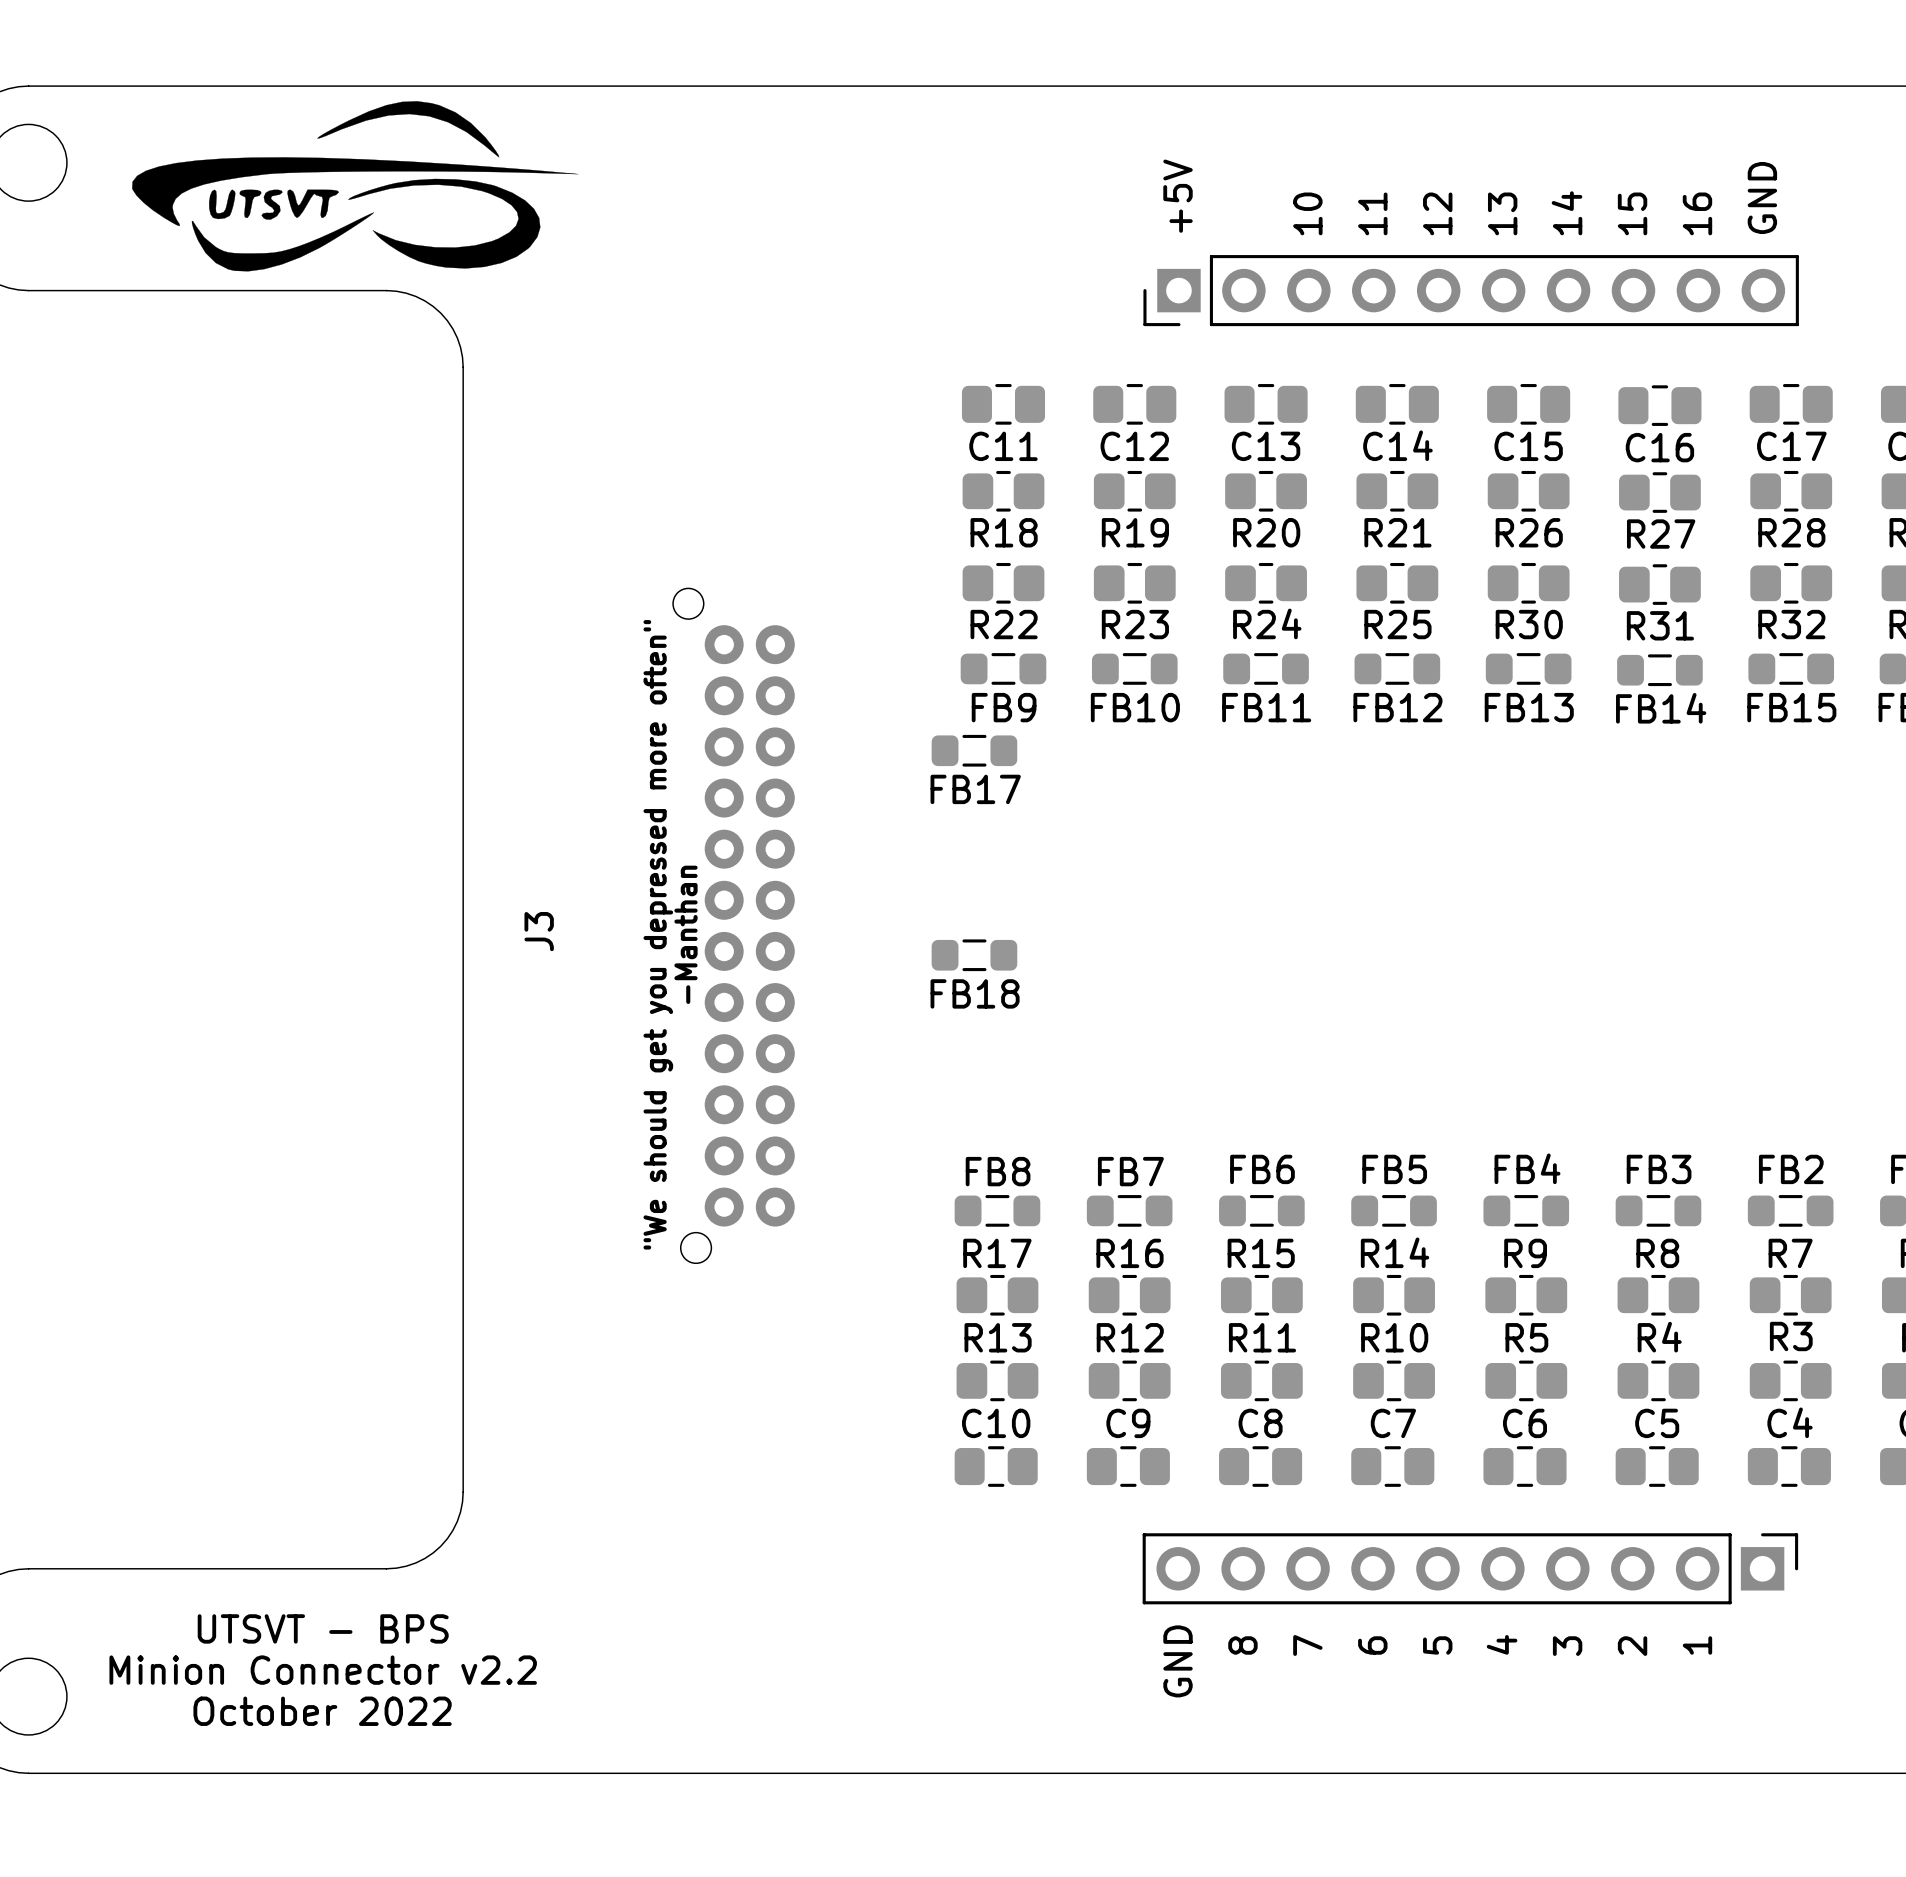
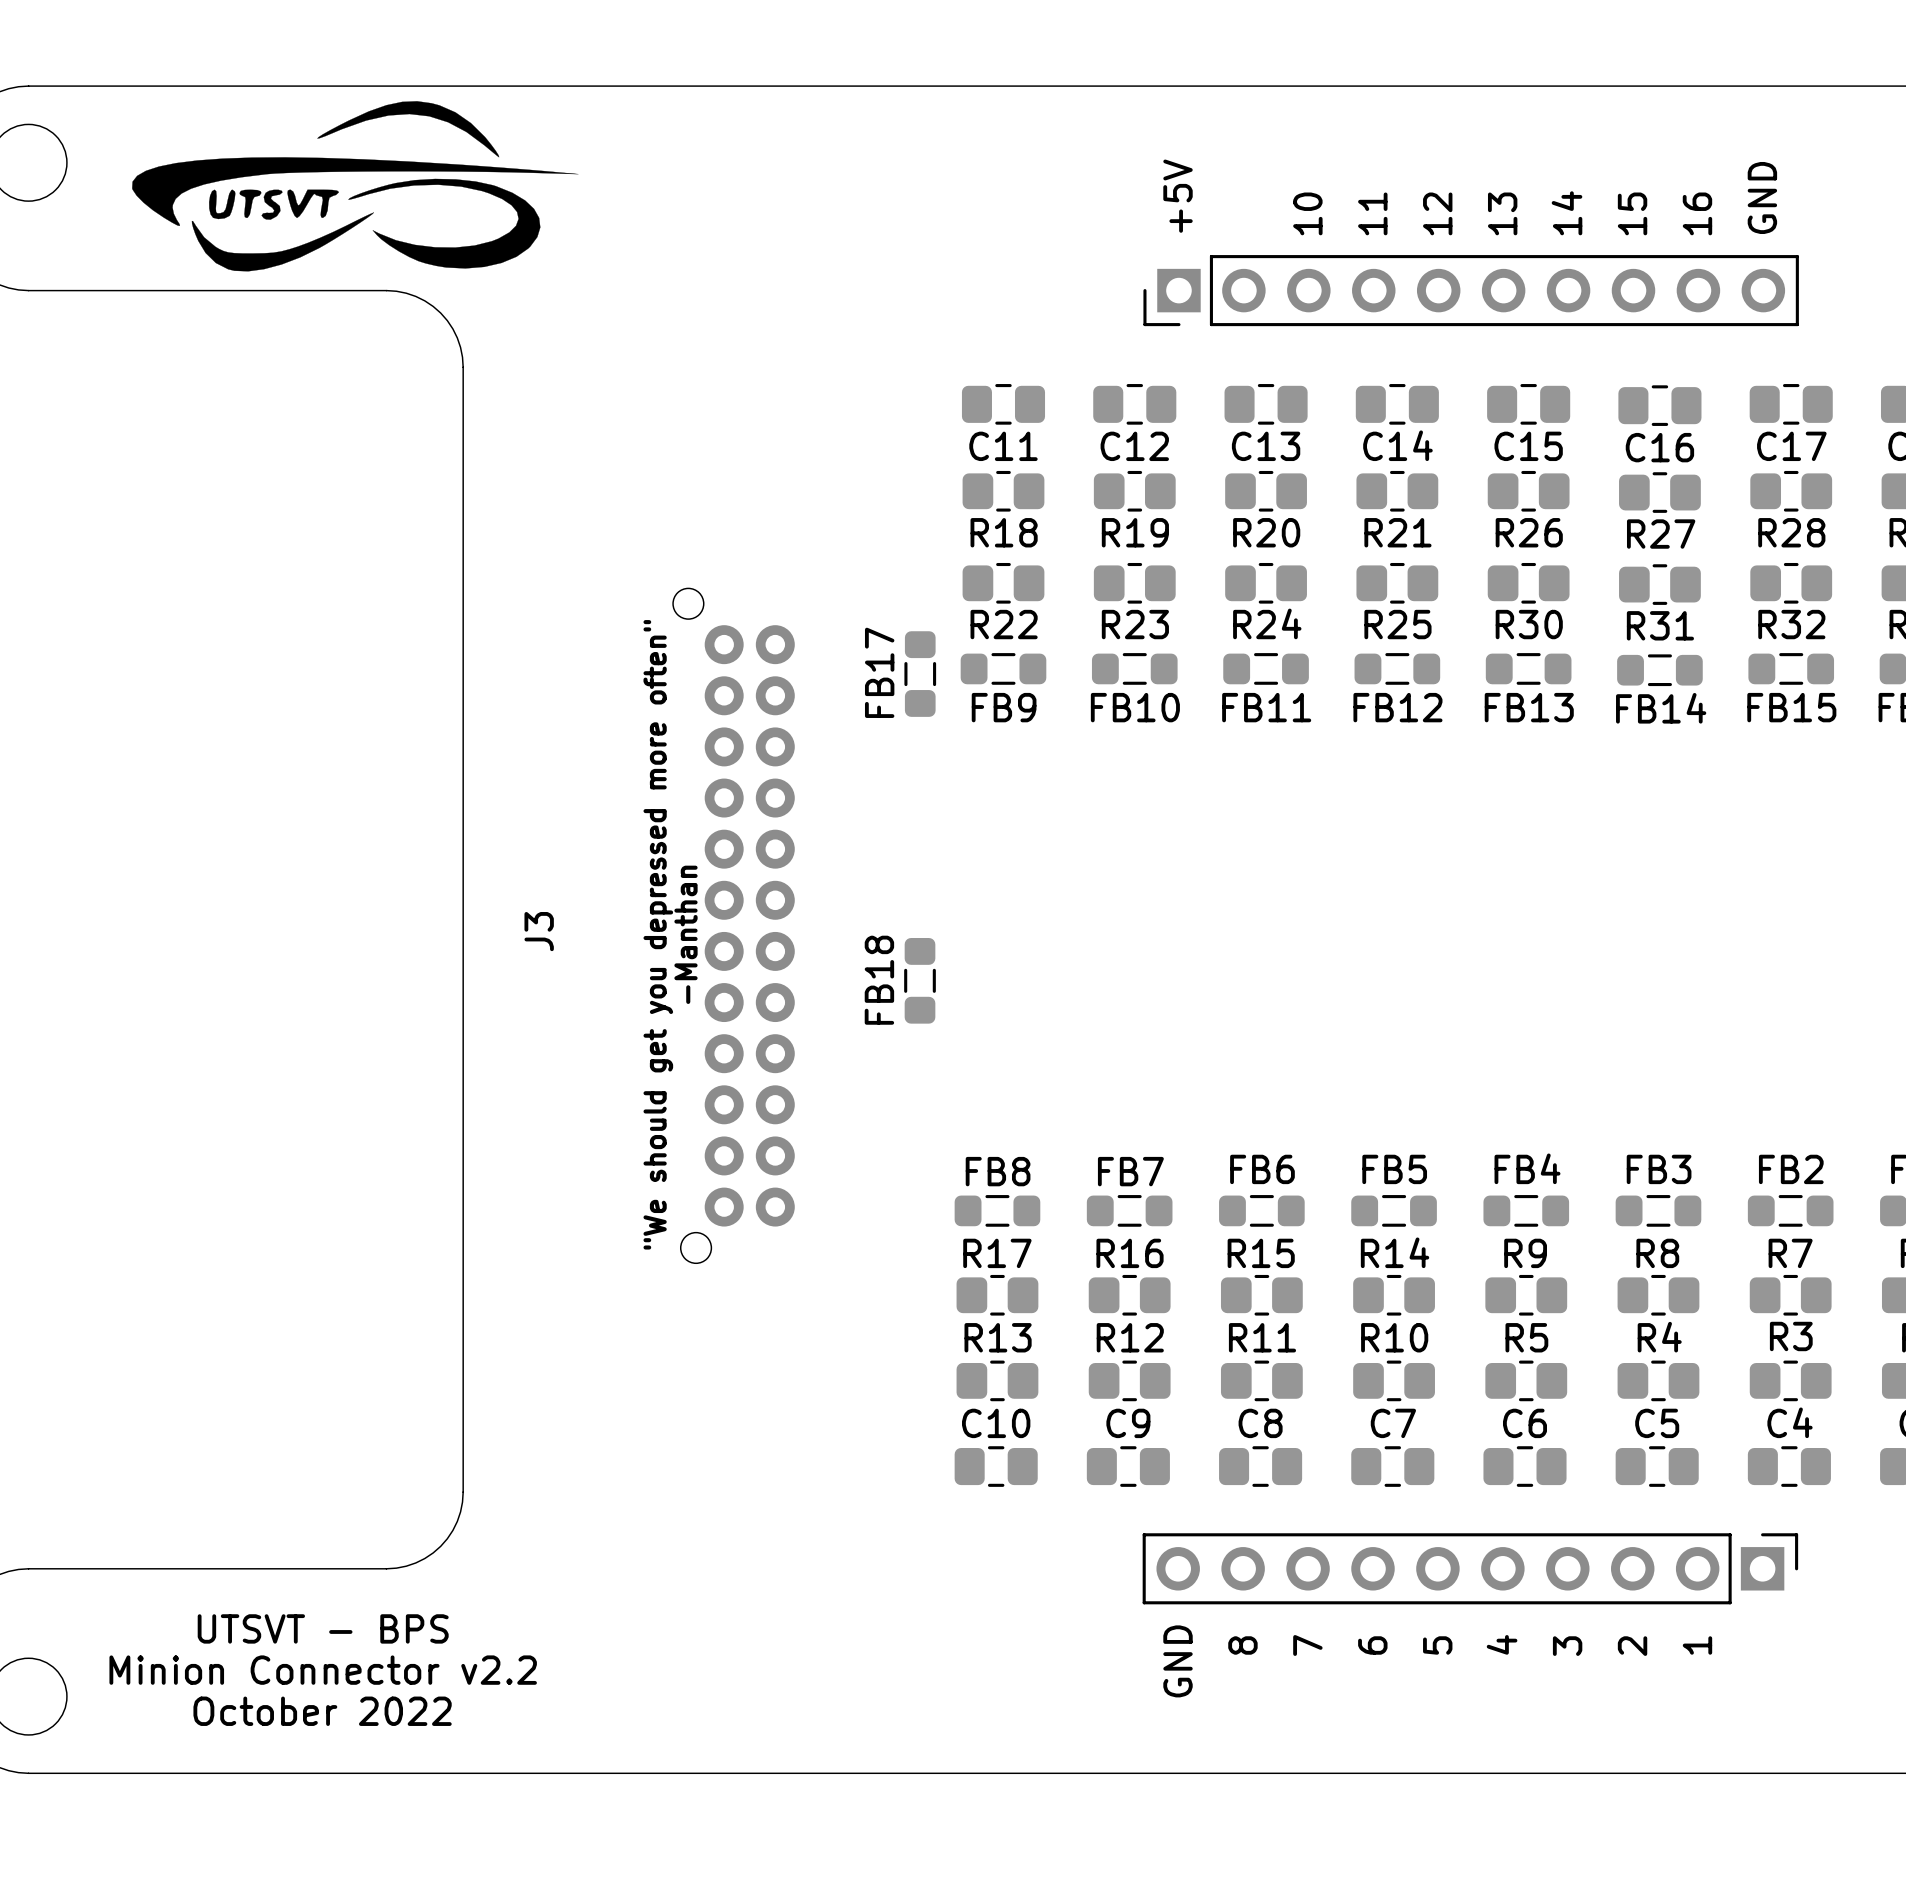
FB17 rotation: 0° (974, 750) -> 90° clockwise (920, 674)
FB17 position: (974, 750) -> (920, 674)
FB18 rotation: 0° (974, 955) -> 90° clockwise (920, 980)
FB18 position: (974, 955) -> (920, 980)

